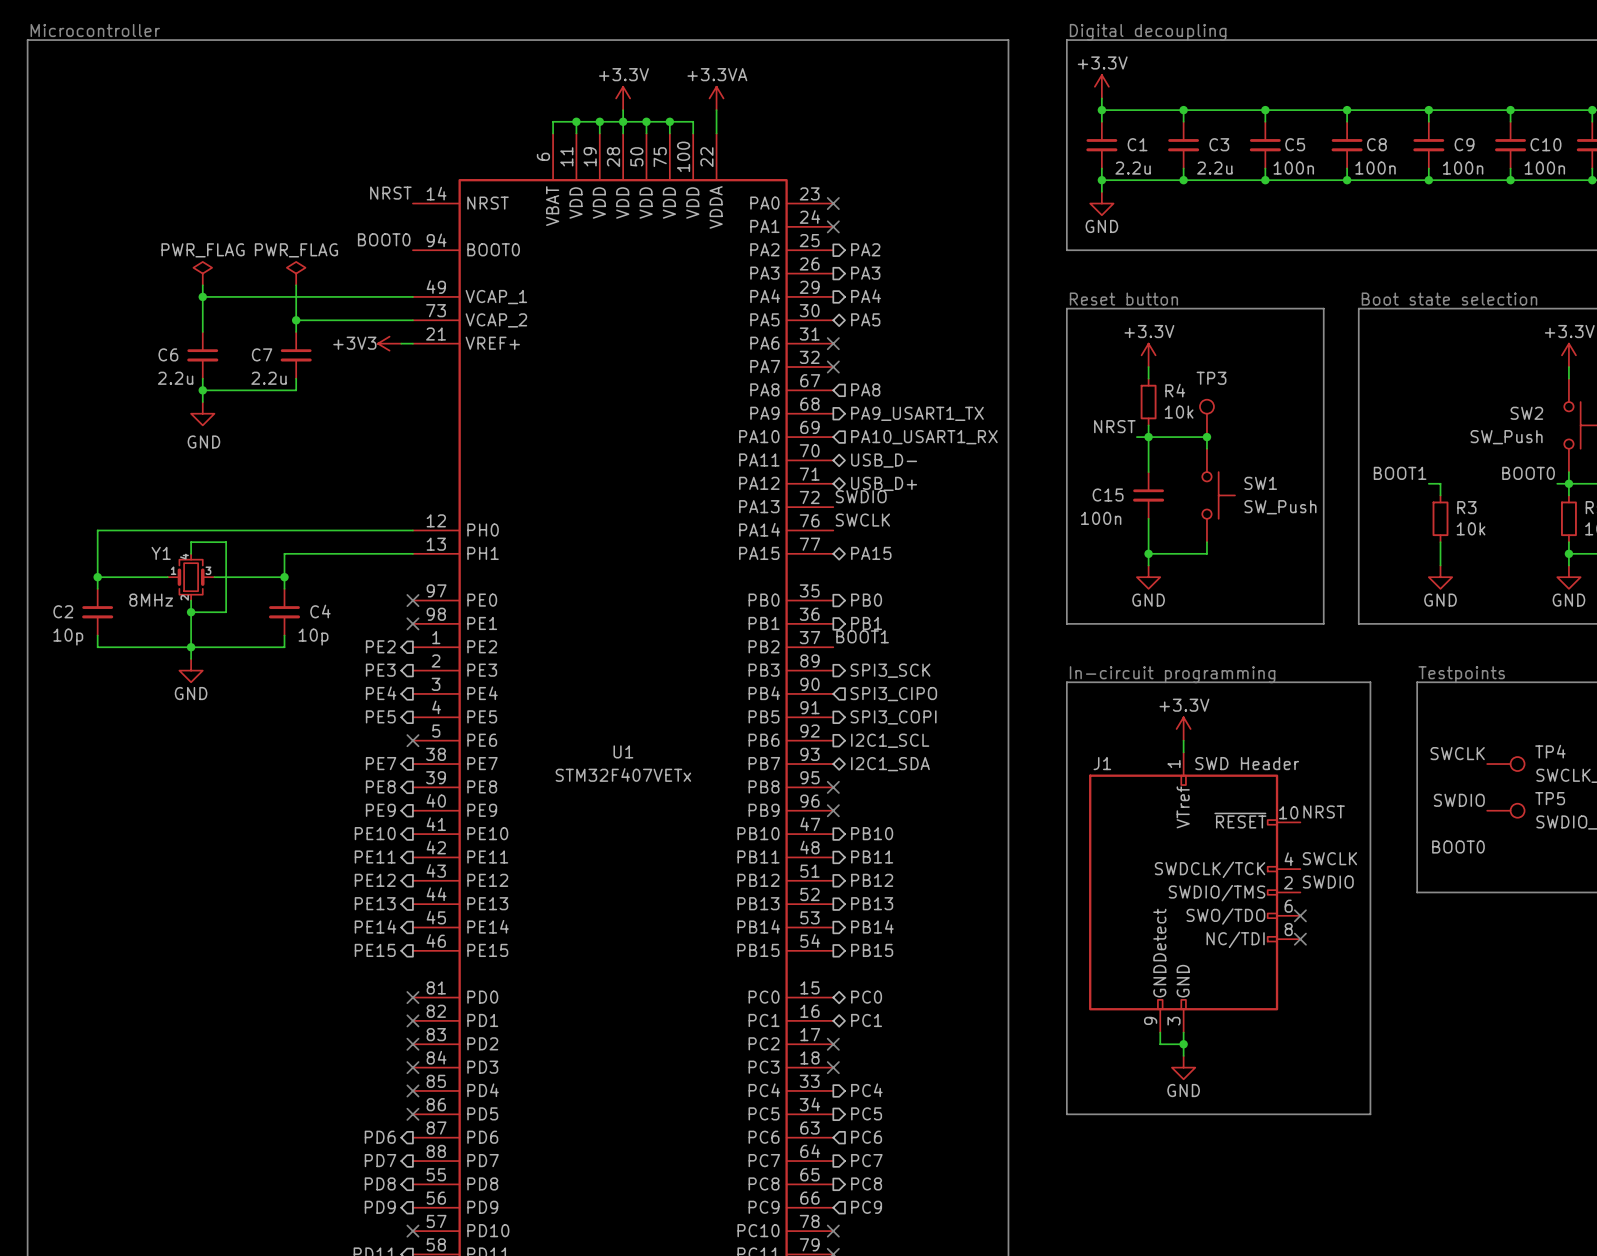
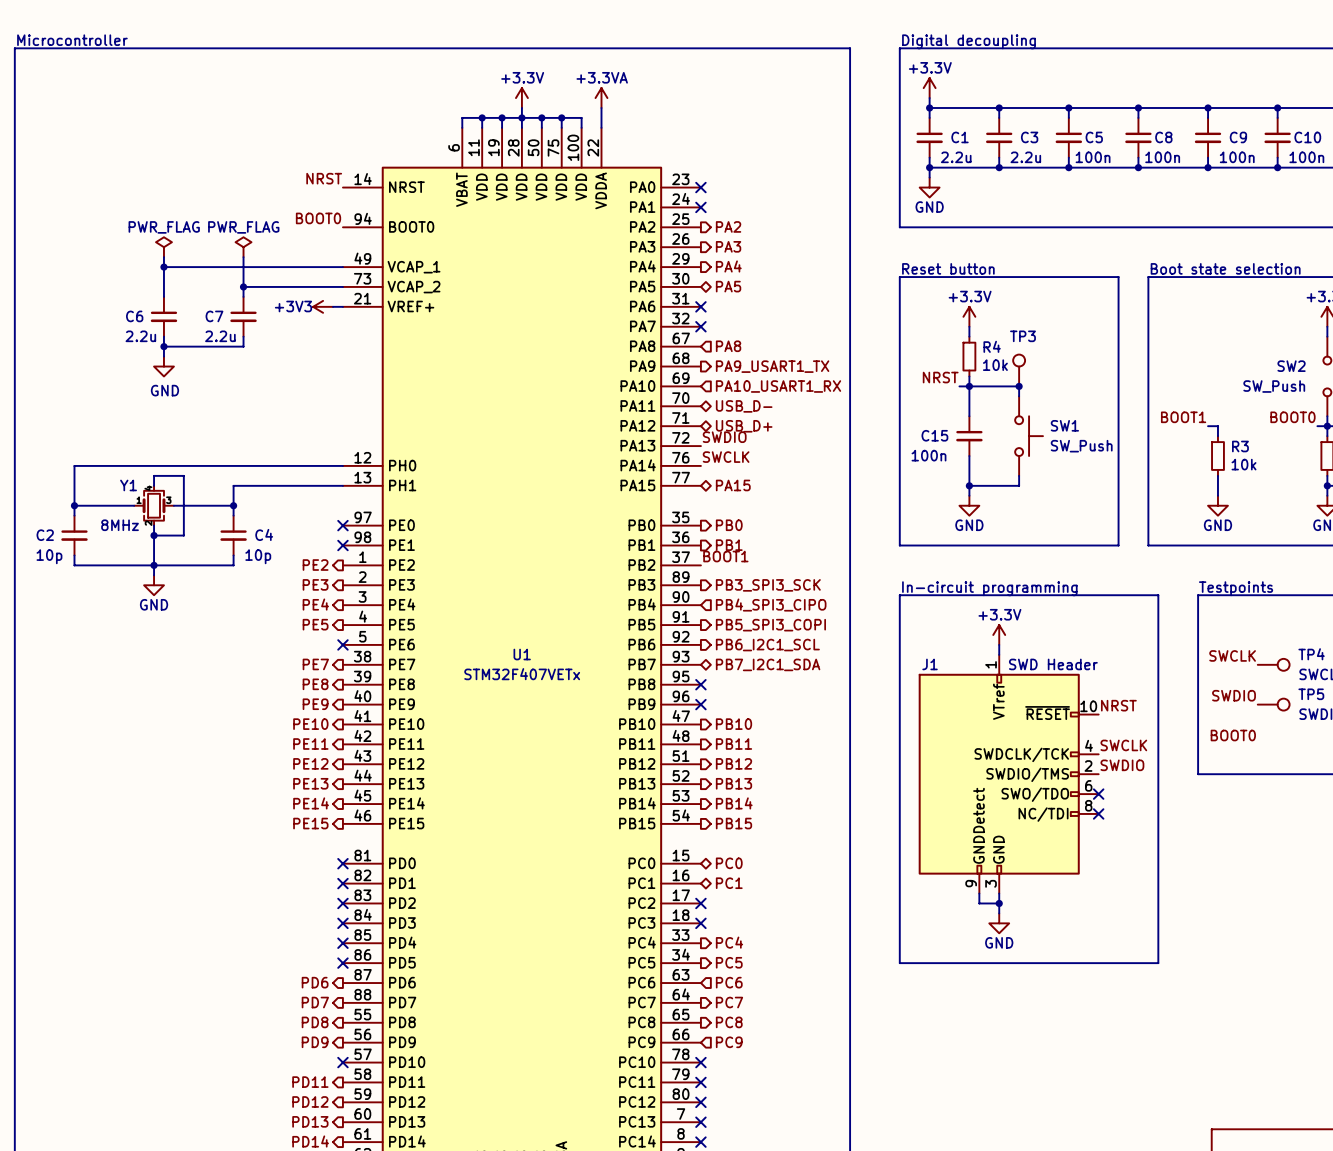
hierarchical label: SPI3_SCK (890, 670) -> PB3_SPI3_SCK (768, 585)
hierarchical label: SPI3_CIPO (893, 694) -> PB4_SPI3_CIPO (771, 605)
hierarchical label: SPI3_COPI (893, 717) -> PB5_SPI3_COPI (770, 625)
hierarchical label: I2C1_SCL (890, 740) -> PB6_I2C1_SCL (767, 645)
hierarchical label: I2C1_SDA (890, 764) -> PB7_I2C1_SDA (768, 664)

